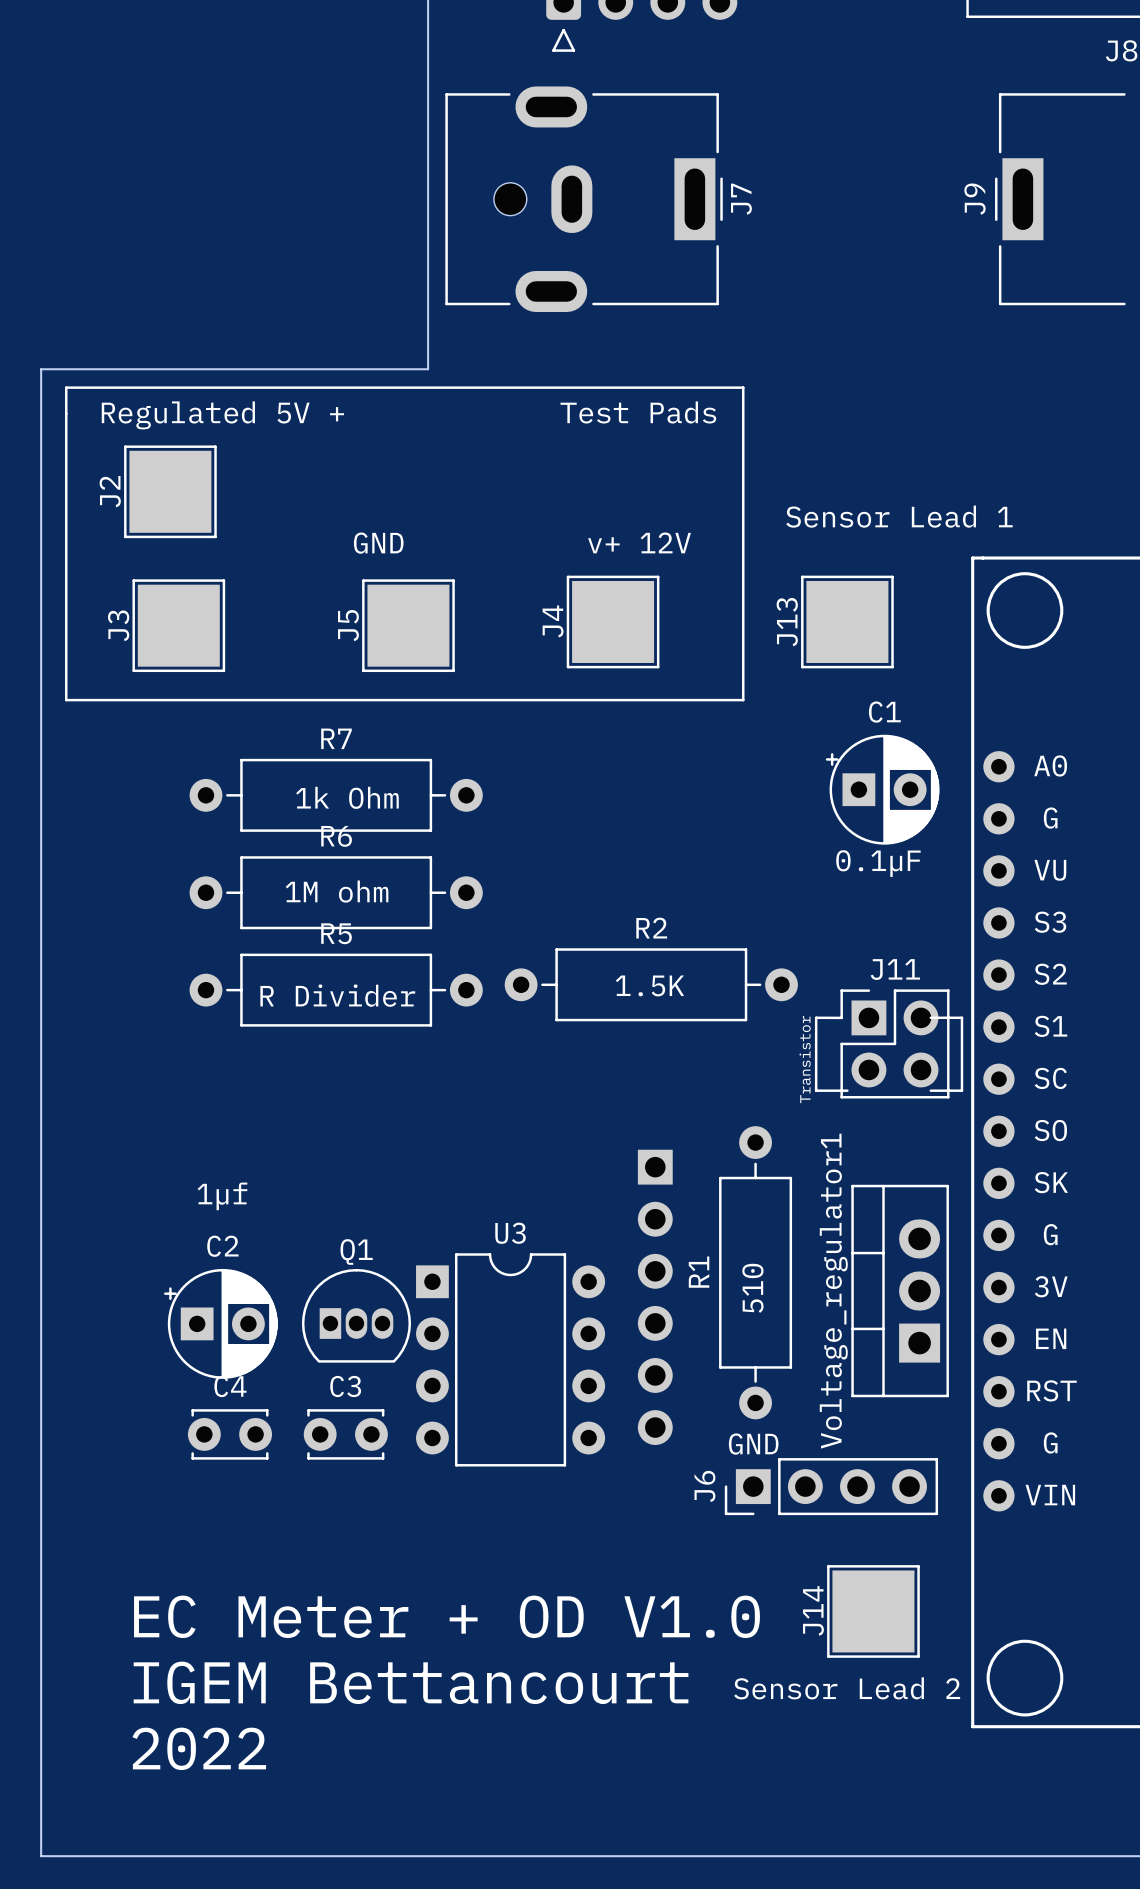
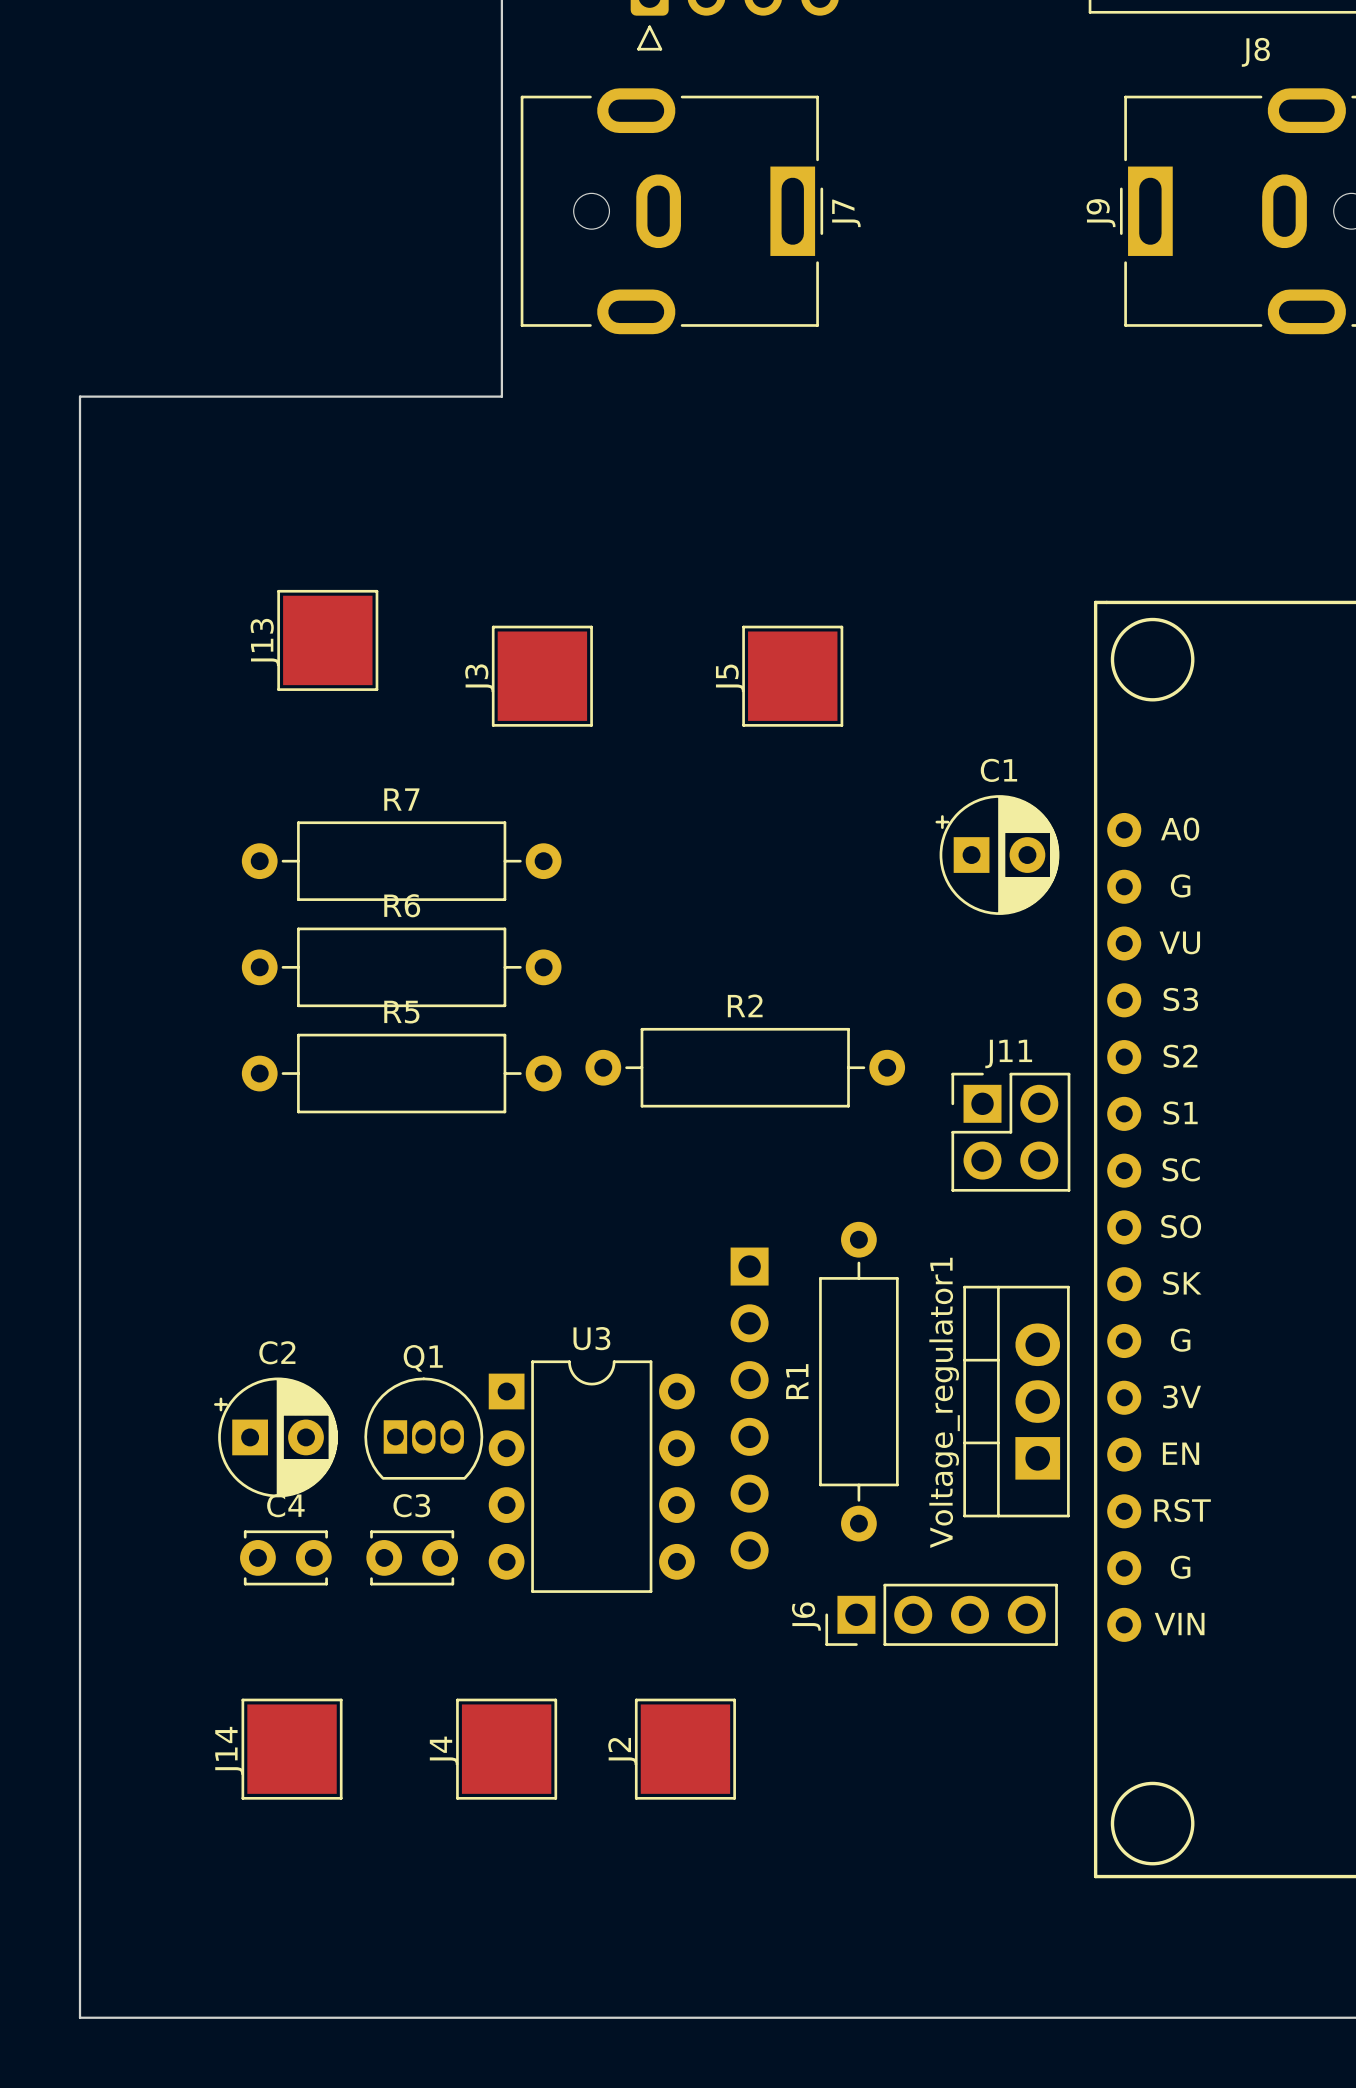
line: (66, 387) (743, 387) (743, 700) (66, 700) (66, 387) -> none
text: Test Pads (638, 412) -> none
text: Regulated 5V + (222, 415) -> none
J2 position: (170, 491) -> (685, 1749)
text: Sensor Lead 1 (899, 516) -> none
text: v+ 12V (639, 542) -> none
text: GND (378, 543) -> none
J4 position: (613, 621) -> (506, 1749)
J13 position: (847, 621) -> (327, 640)
J3 position: (178, 625) -> (542, 676)
J5 position: (408, 625) -> (792, 676)
text: 1k Ohm (347, 797) -> none
text: 0.1µF (878, 863) -> none
text: 1M ohm (337, 891) -> none
text: 1.5K (649, 985) -> none
text: R Divider (337, 995) -> none
line: (841, 1017) (816, 1017) (816, 1090) (847, 1090) -> none
line: (930, 1017) (961, 1017) (961, 1090) (930, 1090) -> none
text: Transistor (805, 1059) -> none
text: 1µf (222, 1196) -> none
text: 510 (752, 1288) -> none
text: GND (753, 1444) -> none
J14 position: (873, 1611) -> (292, 1749)
text: EC Meter + OD V1.0 (447, 1616) -> none
text: IGEM Bettancourt (411, 1682) -> none
text: Sensor Lead 2 (847, 1688) -> none
text: 2022 (199, 1748) -> none

